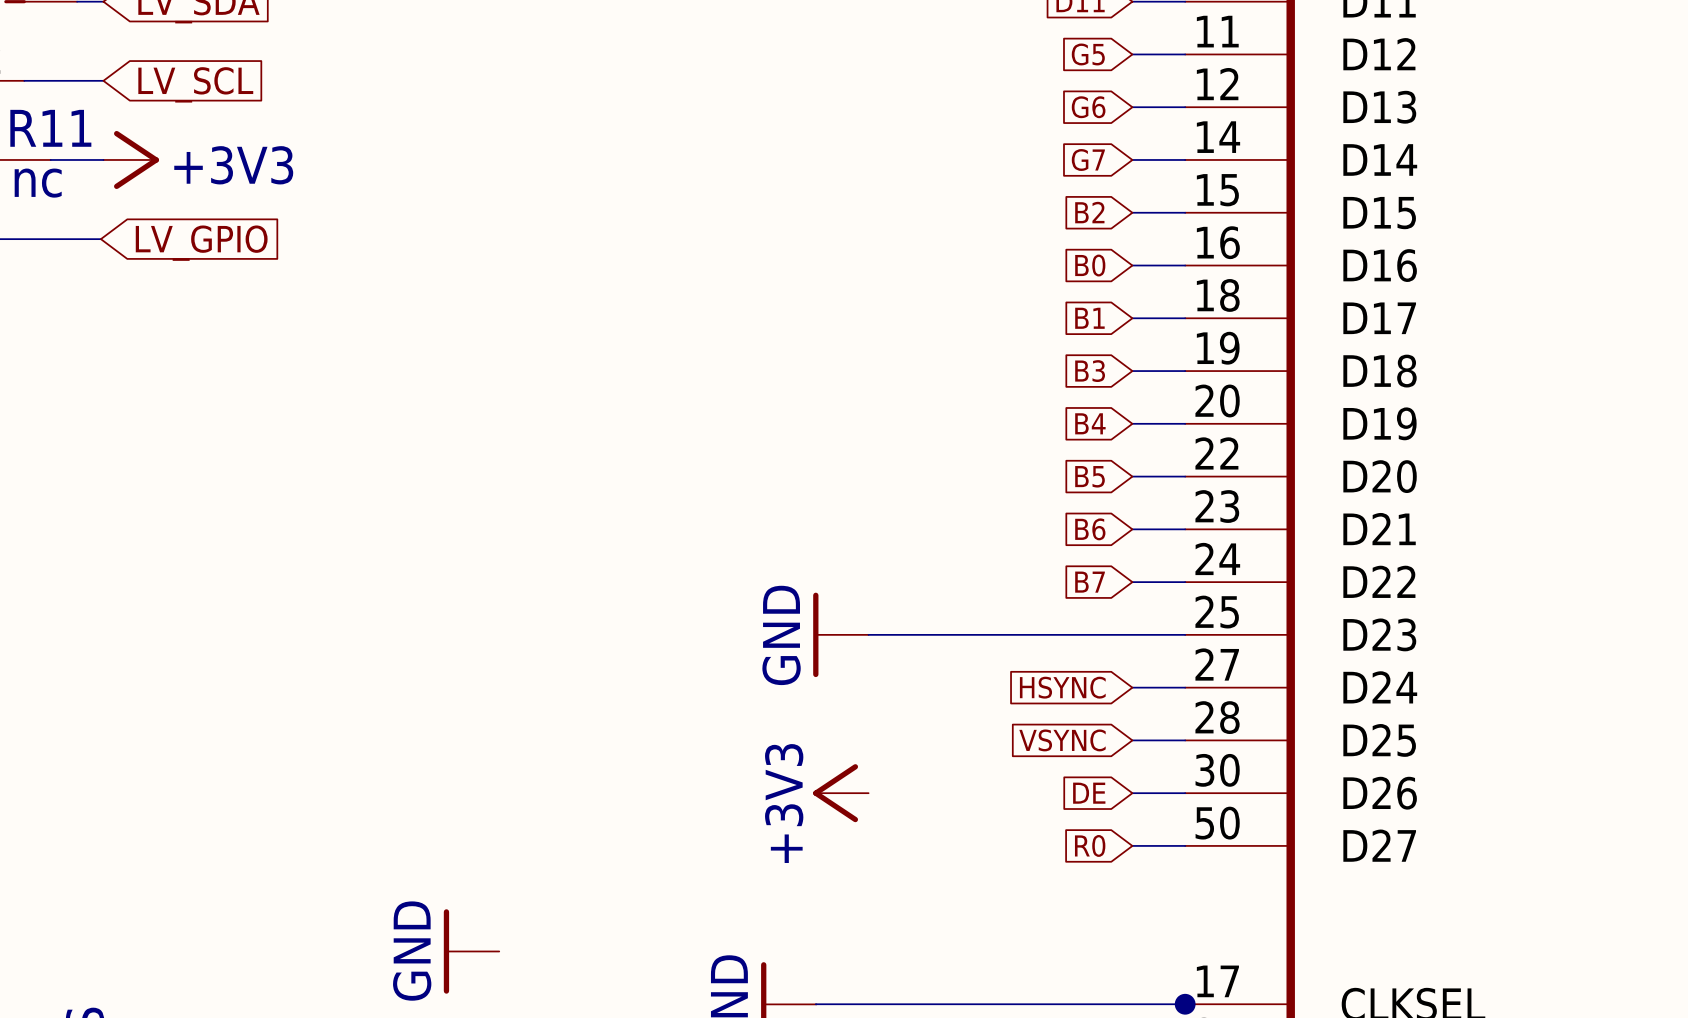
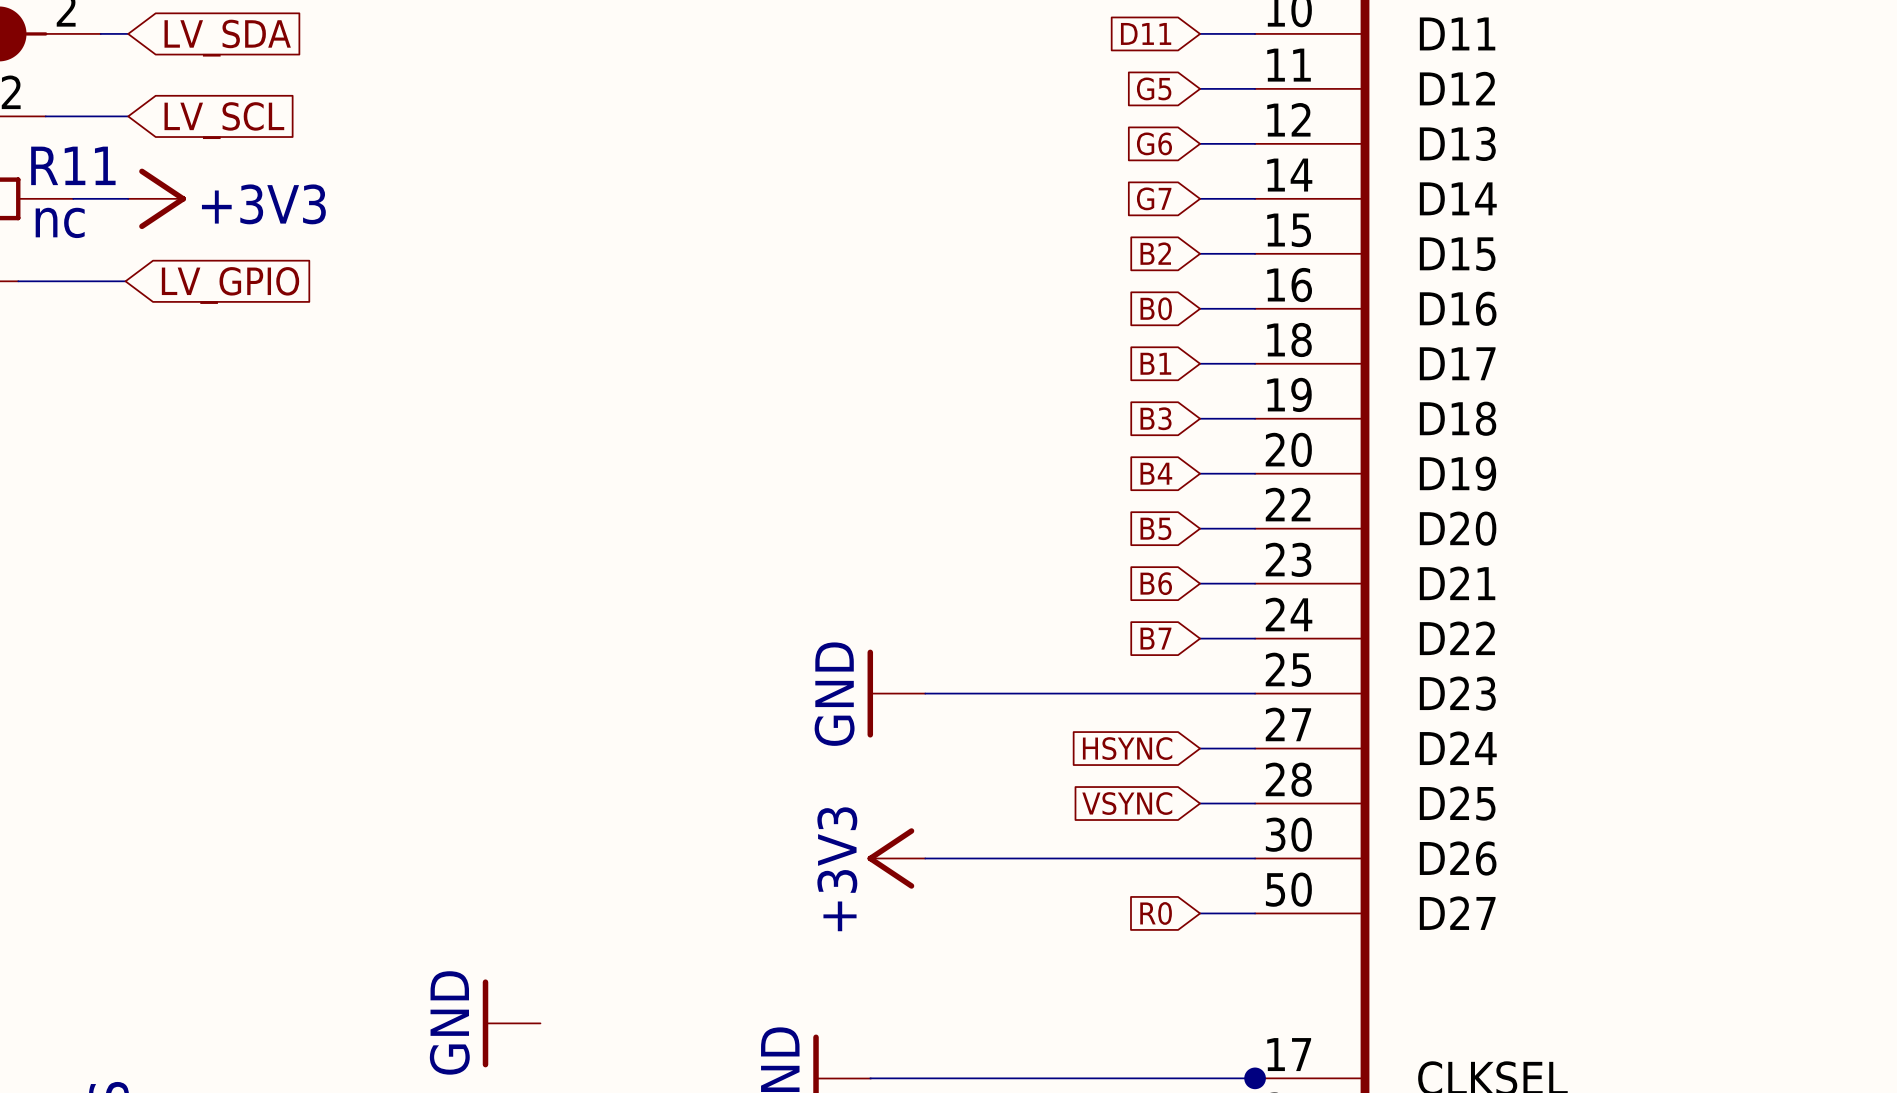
wire: none -> (925, 858) (1200, 858)
global label: DE (1089, 793) -> none

